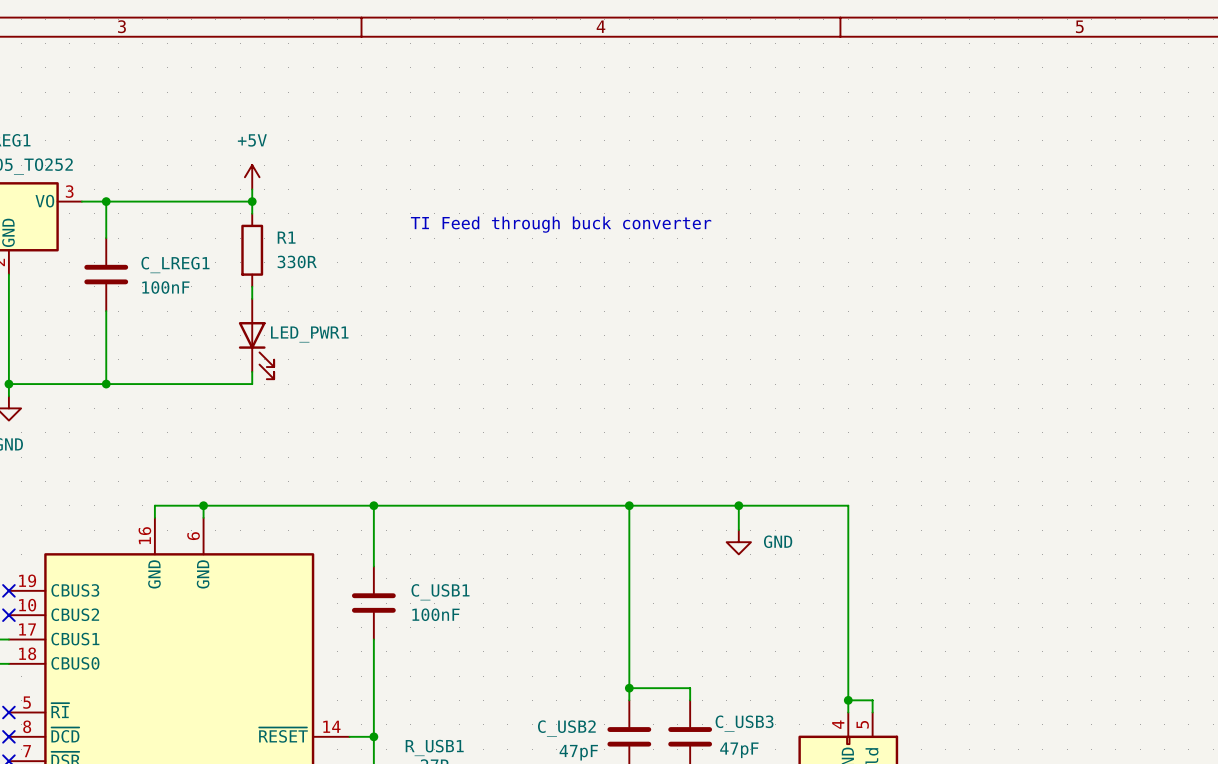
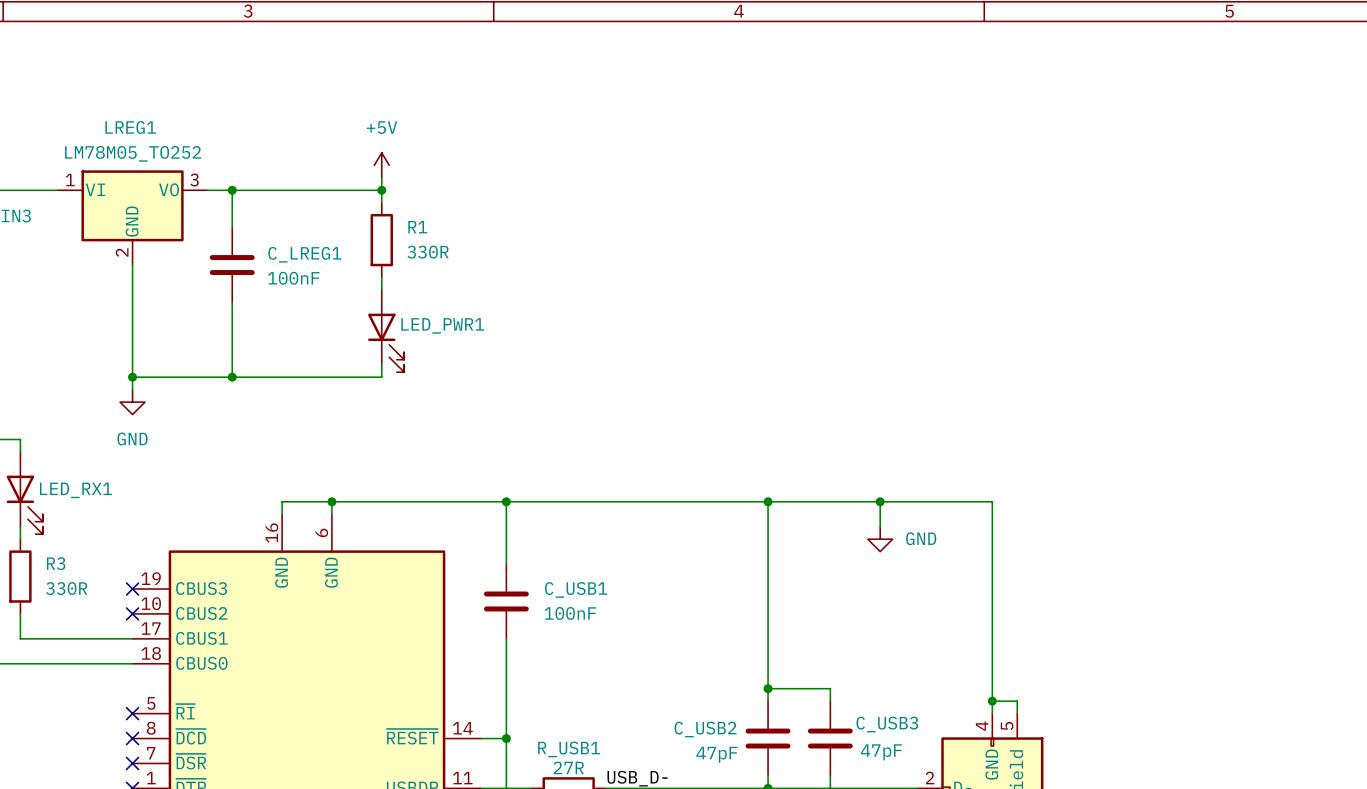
text: TI Feed through buck converter (561, 224) -> none

